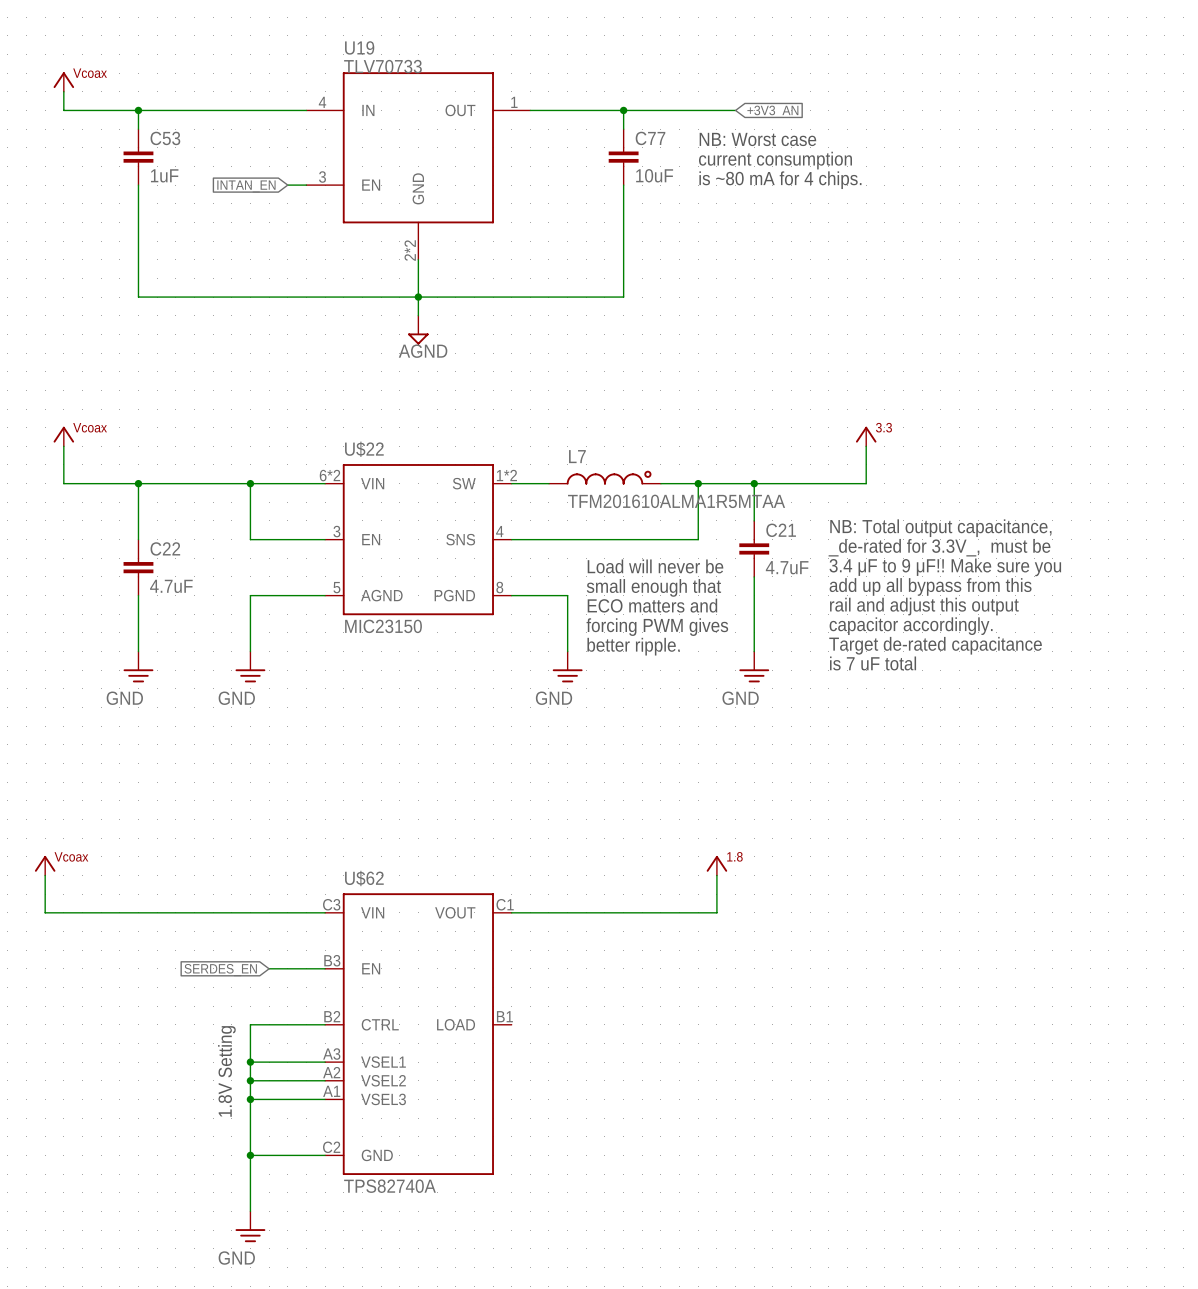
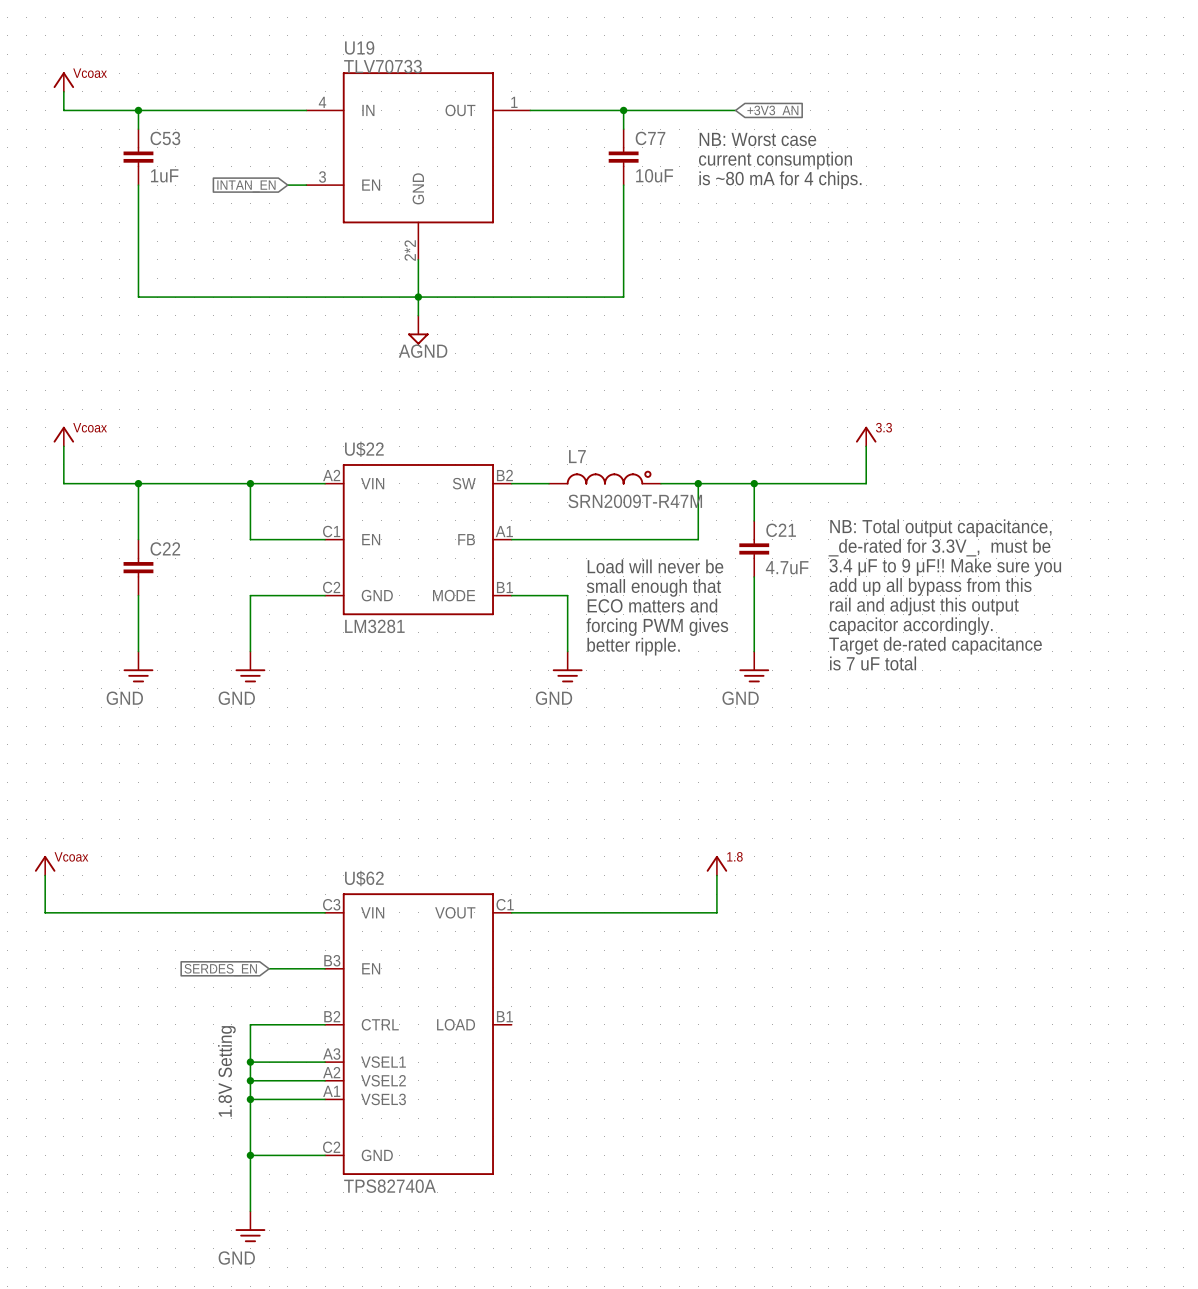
U$22 symbol: [325, 464, 512, 616] -> [325, 464, 512, 616]
L7 value: TFM201610ALMA1R5MTAA (676, 501) -> SRN2009T-R47M (635, 501)
C22 value: 4.7uF (171, 586) -> none
U$22 value: MIC23150 (383, 626) -> LM3281 (374, 626)

